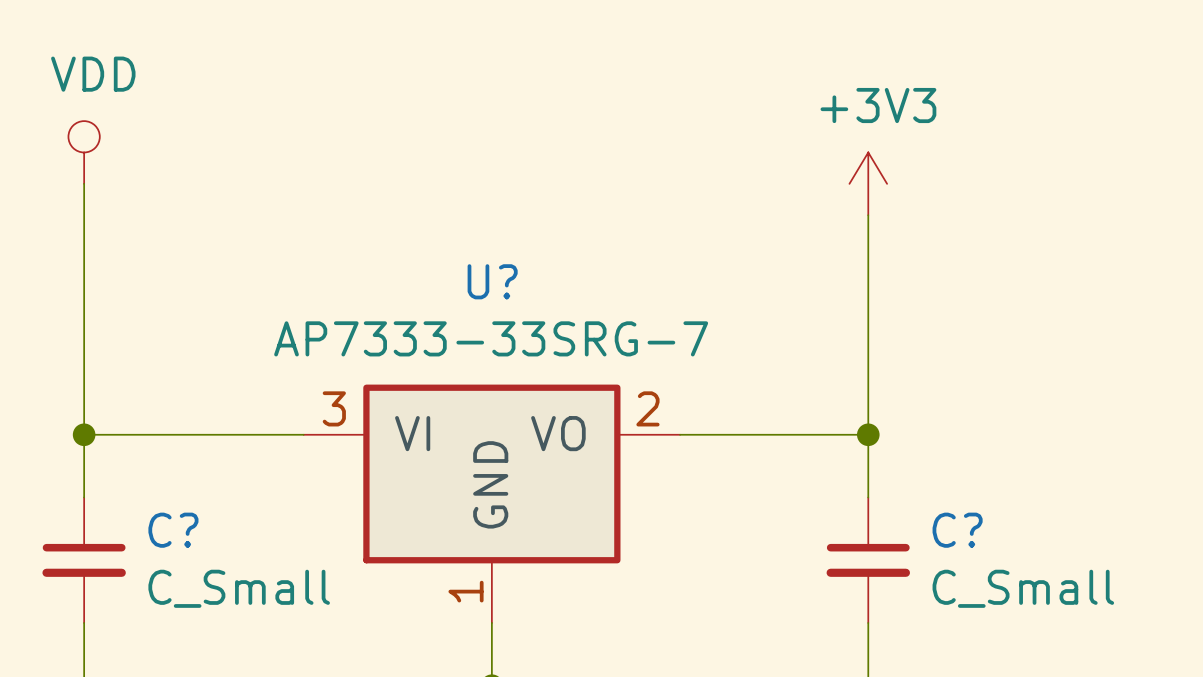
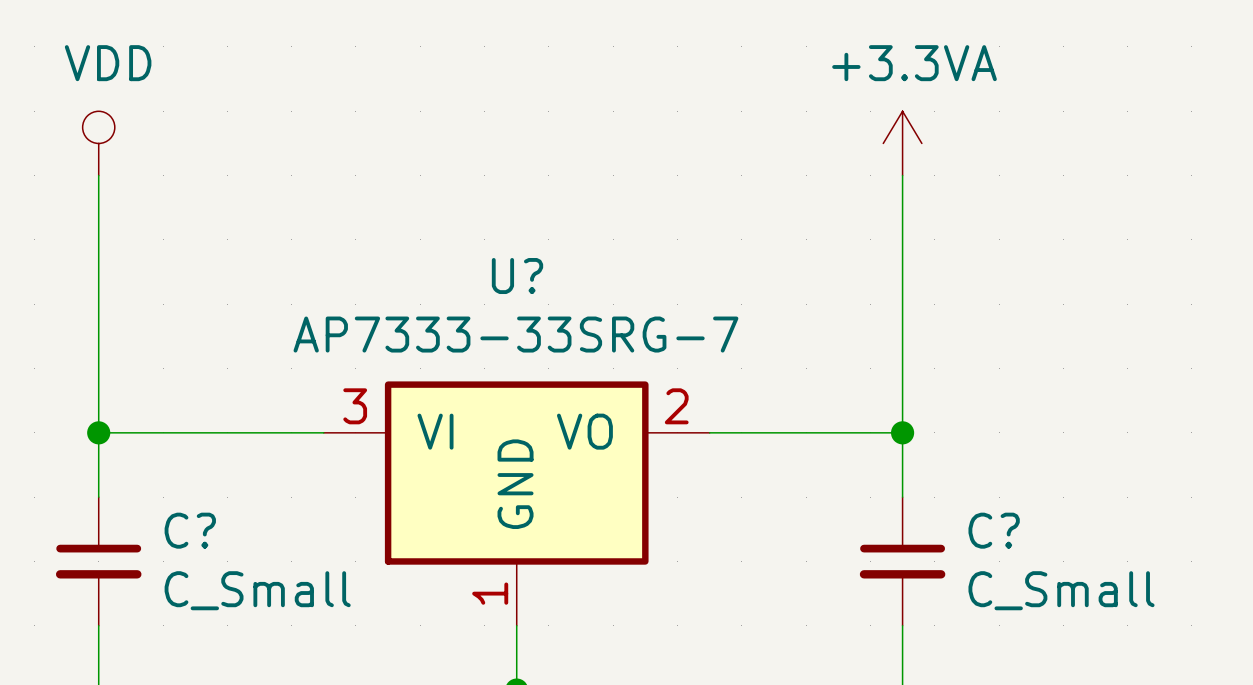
power symbol: none -> +3.3VA (902, 143)
power symbol: +3V3 (868, 183) -> none

